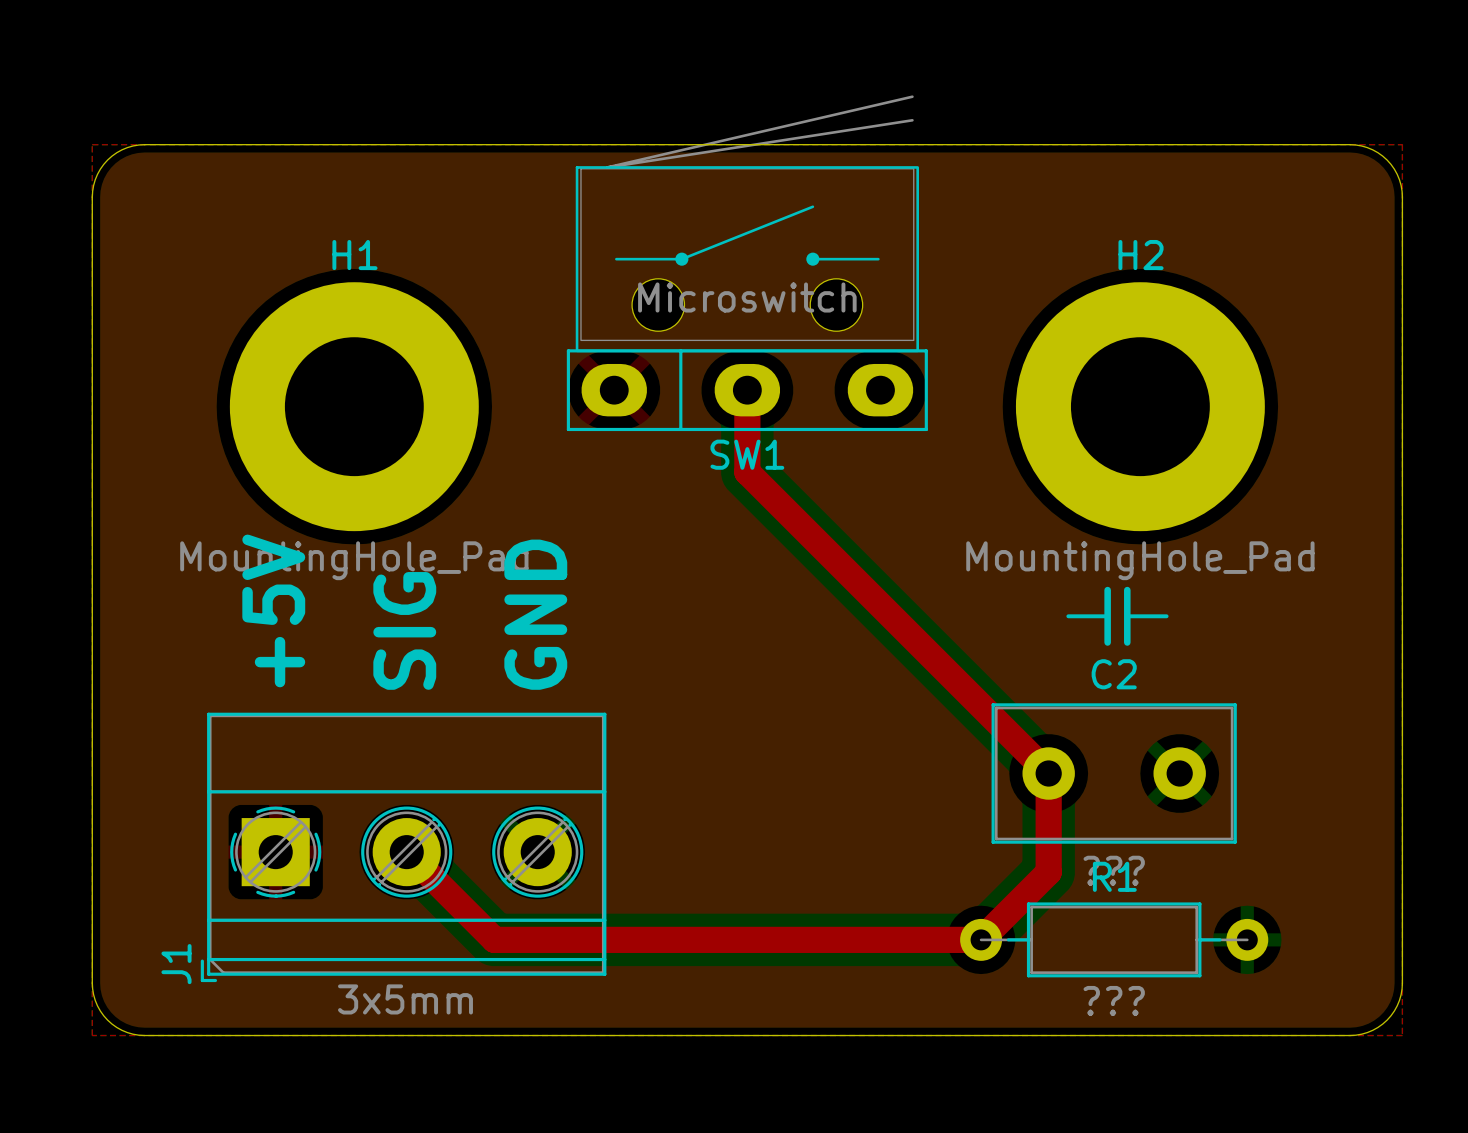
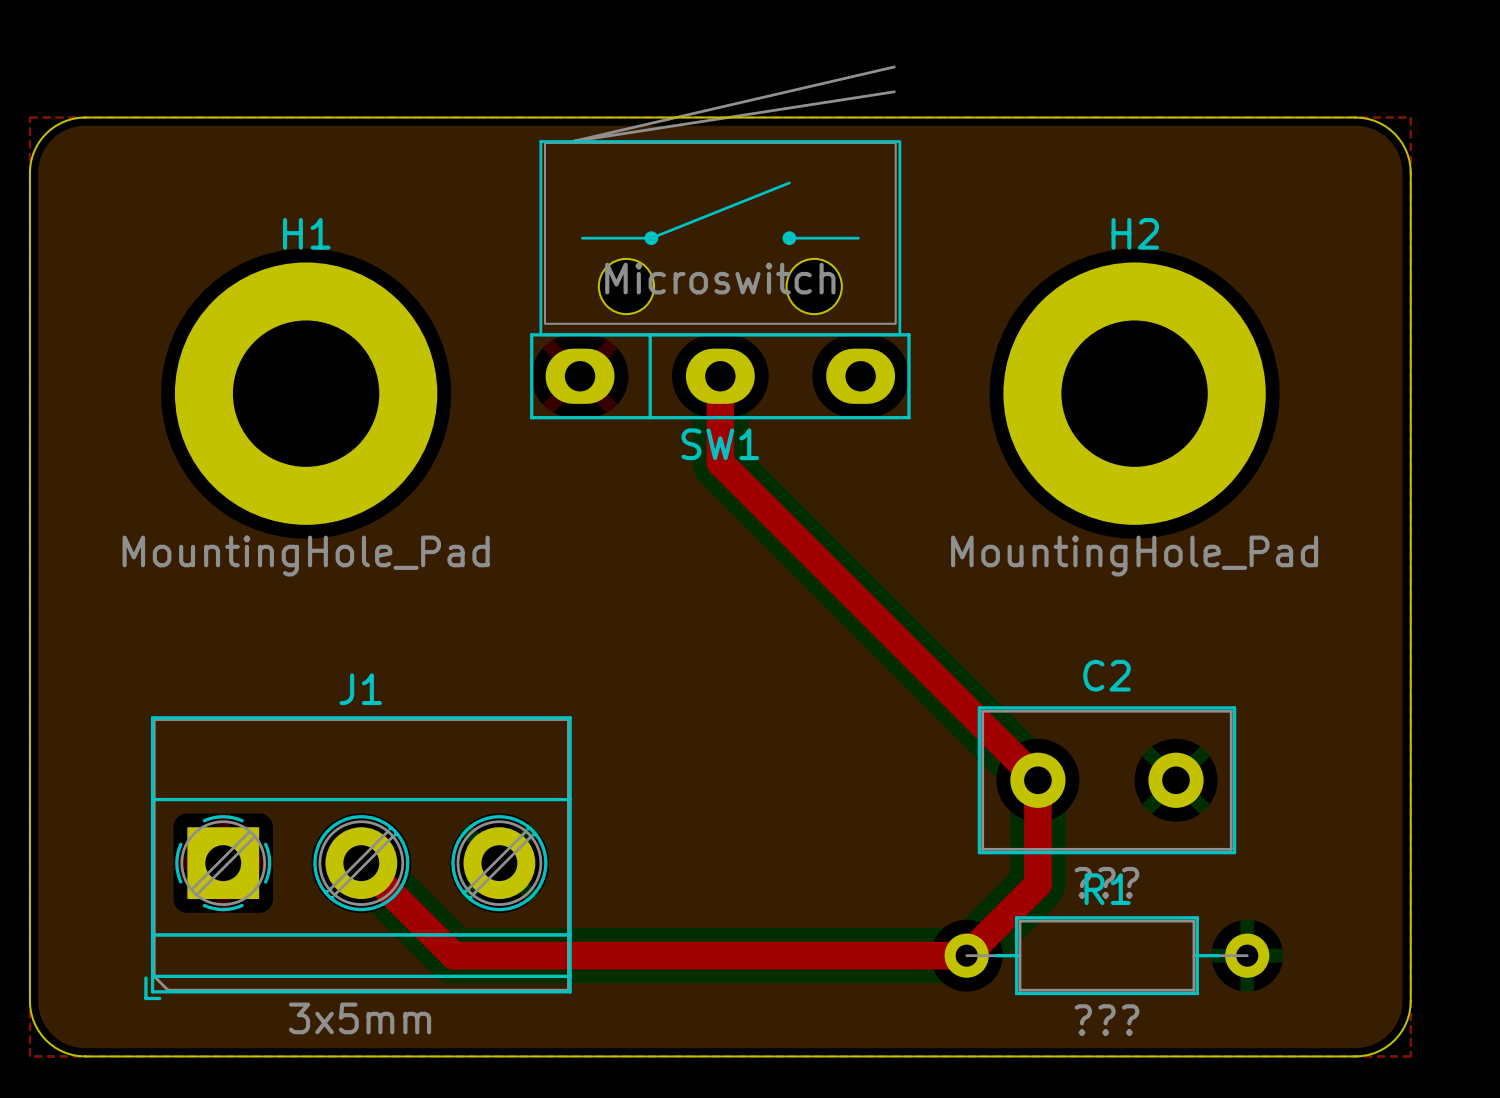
line: (1107, 590) (1107, 642) -> none
line: (1127, 590) (1127, 642) -> none
text: +5V (273, 610) -> none
text: GND (535, 614) -> none
line: (1068, 616) (1107, 616) -> none
line: (1127, 616) (1166, 616) -> none
text: SIG (404, 630) -> none
J1 name rotation: 0° (176, 964) -> 90° clockwise (360, 689)
J1 name position: J1 (176, 964) -> J1 (360, 689)

